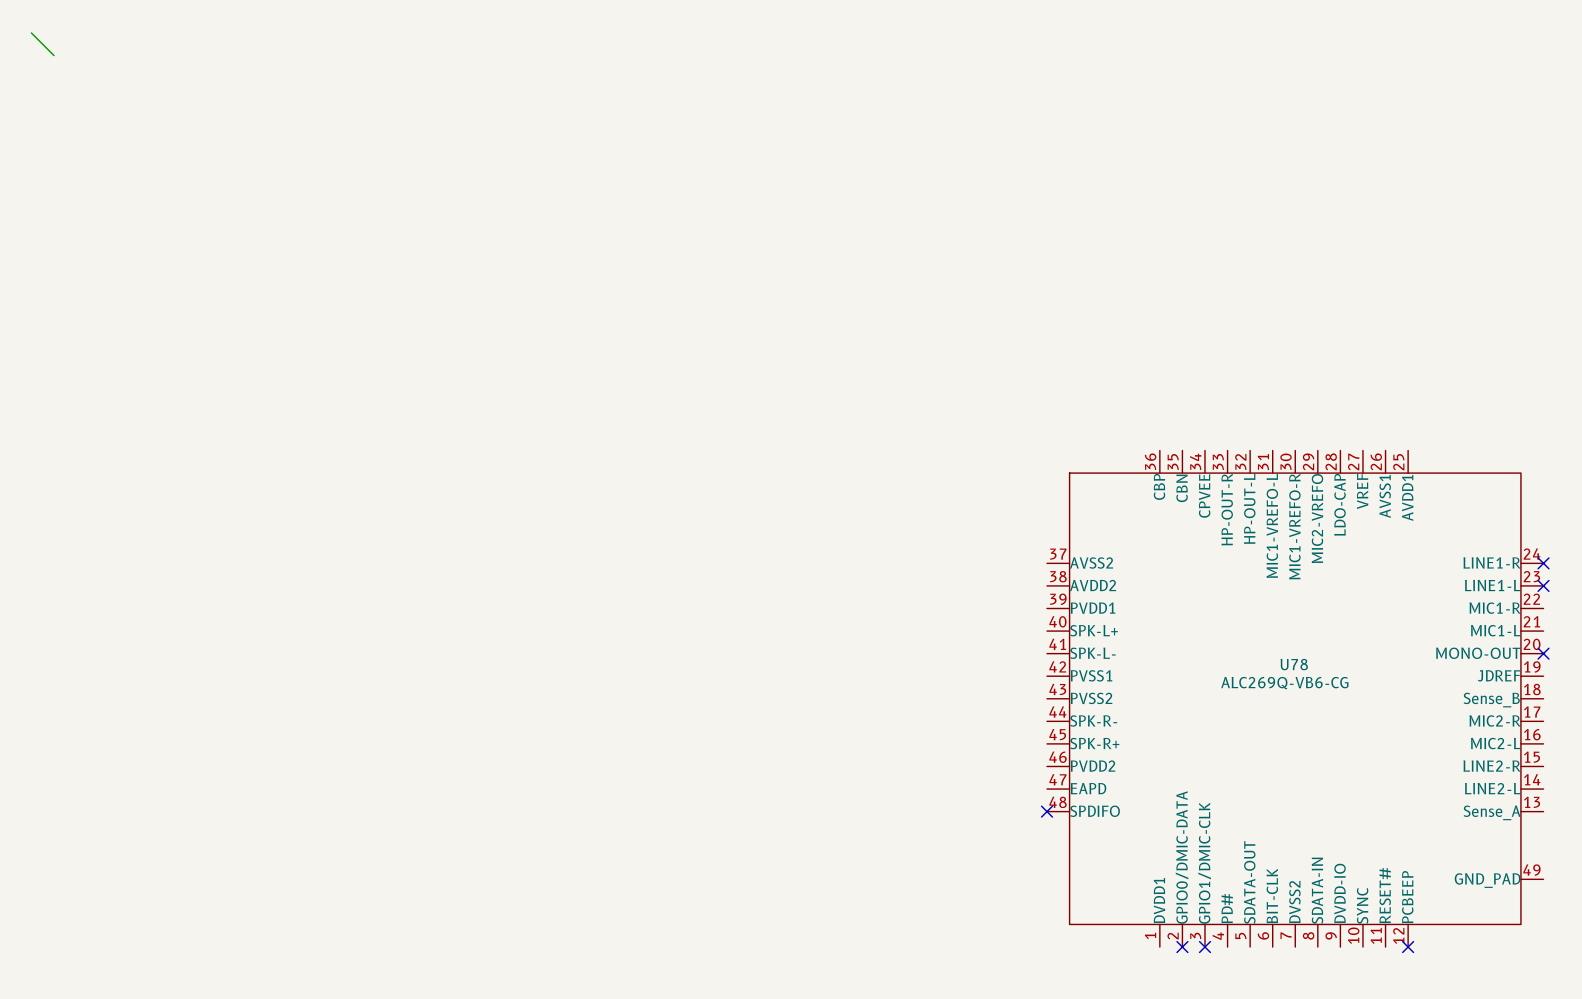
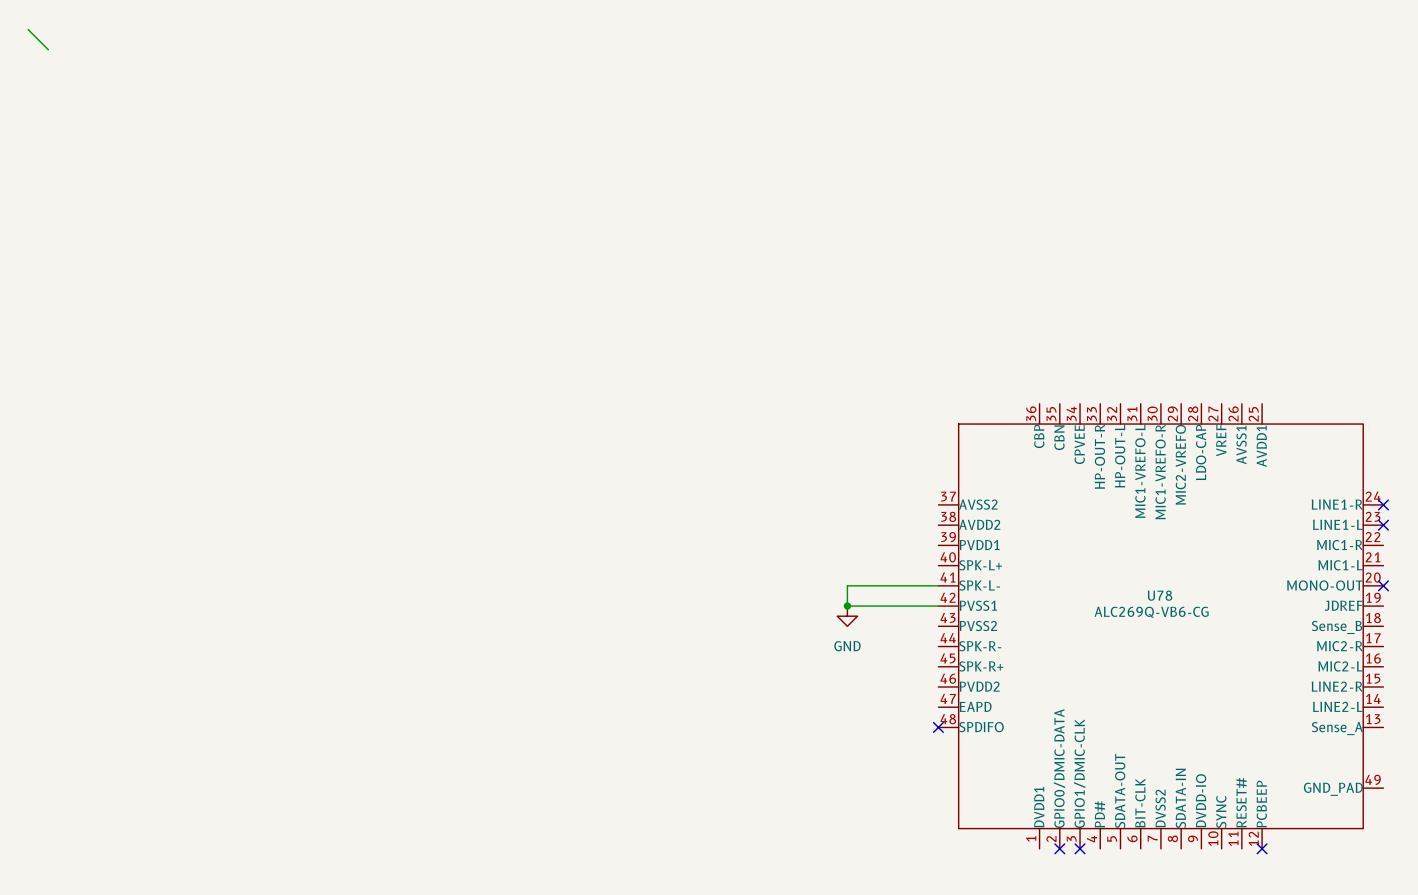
wire: none -> (938, 585) (847, 585) (847, 606) (938, 606)
junction: none -> (847, 606)
power symbol: none -> GND (847, 616)

